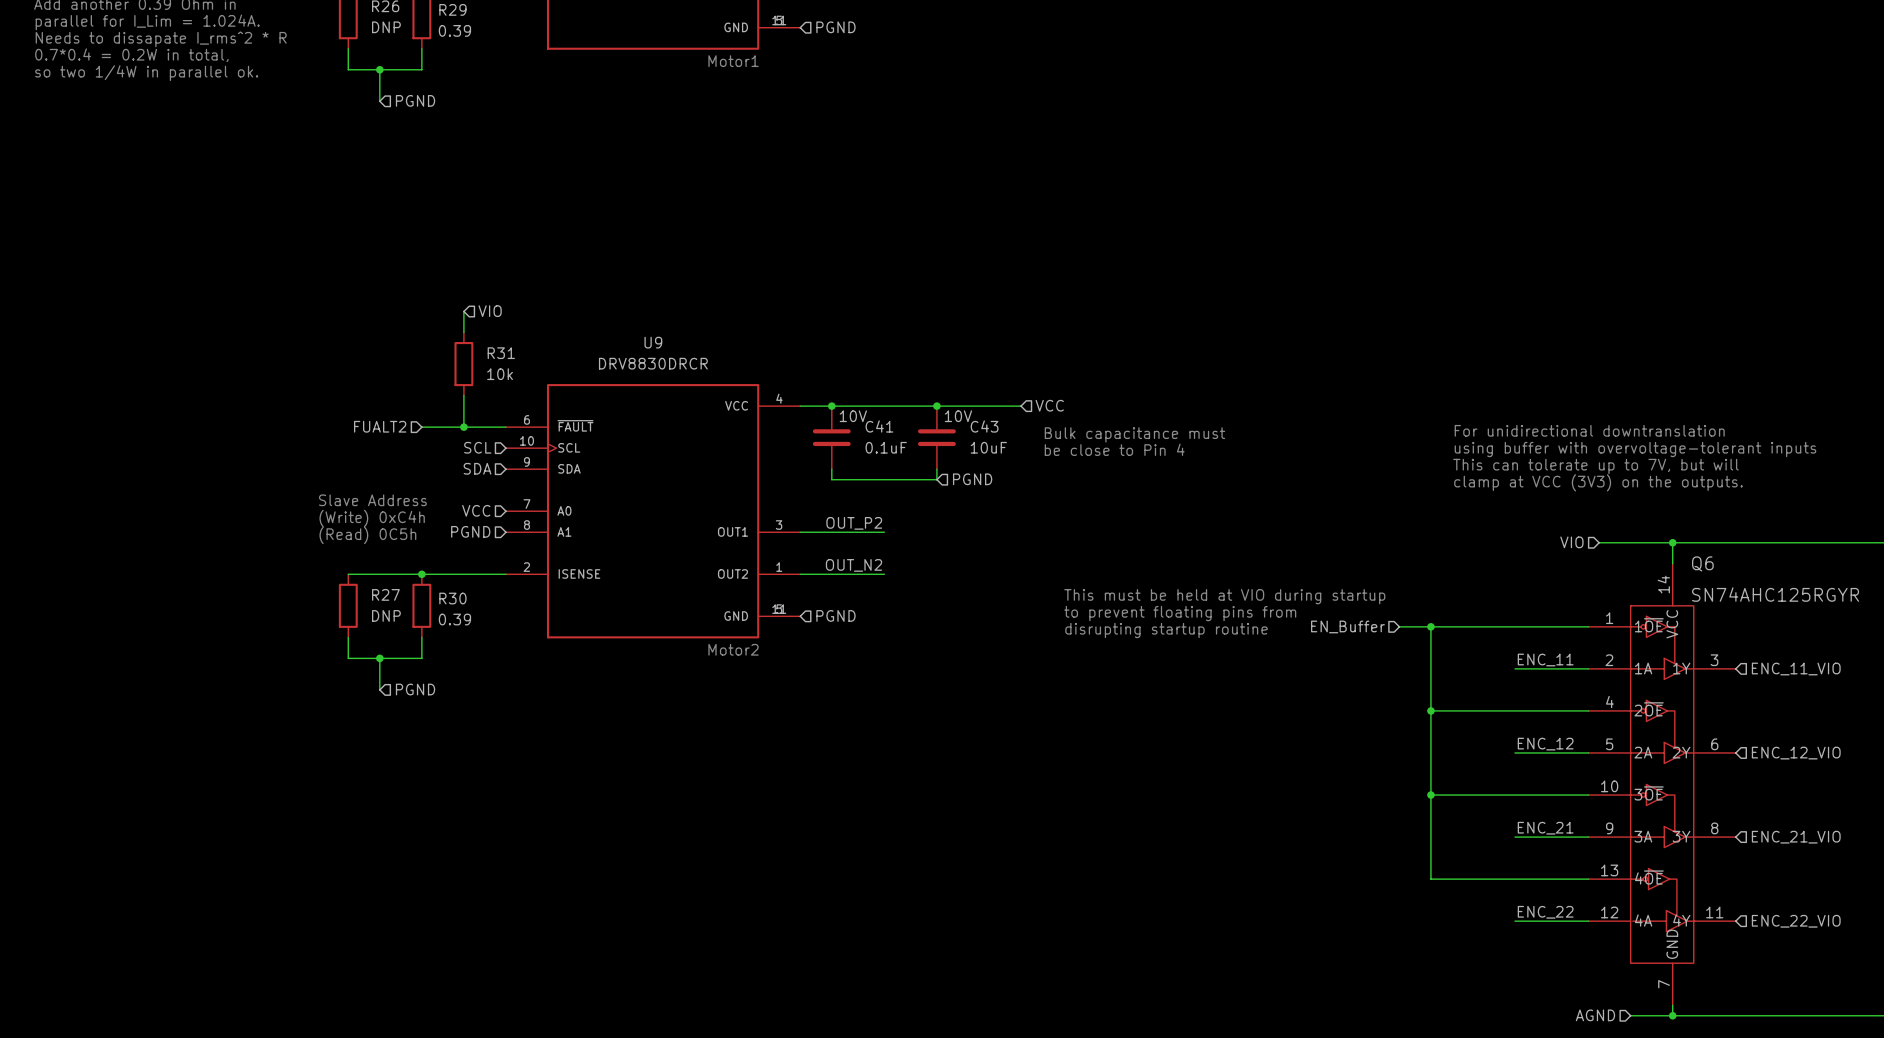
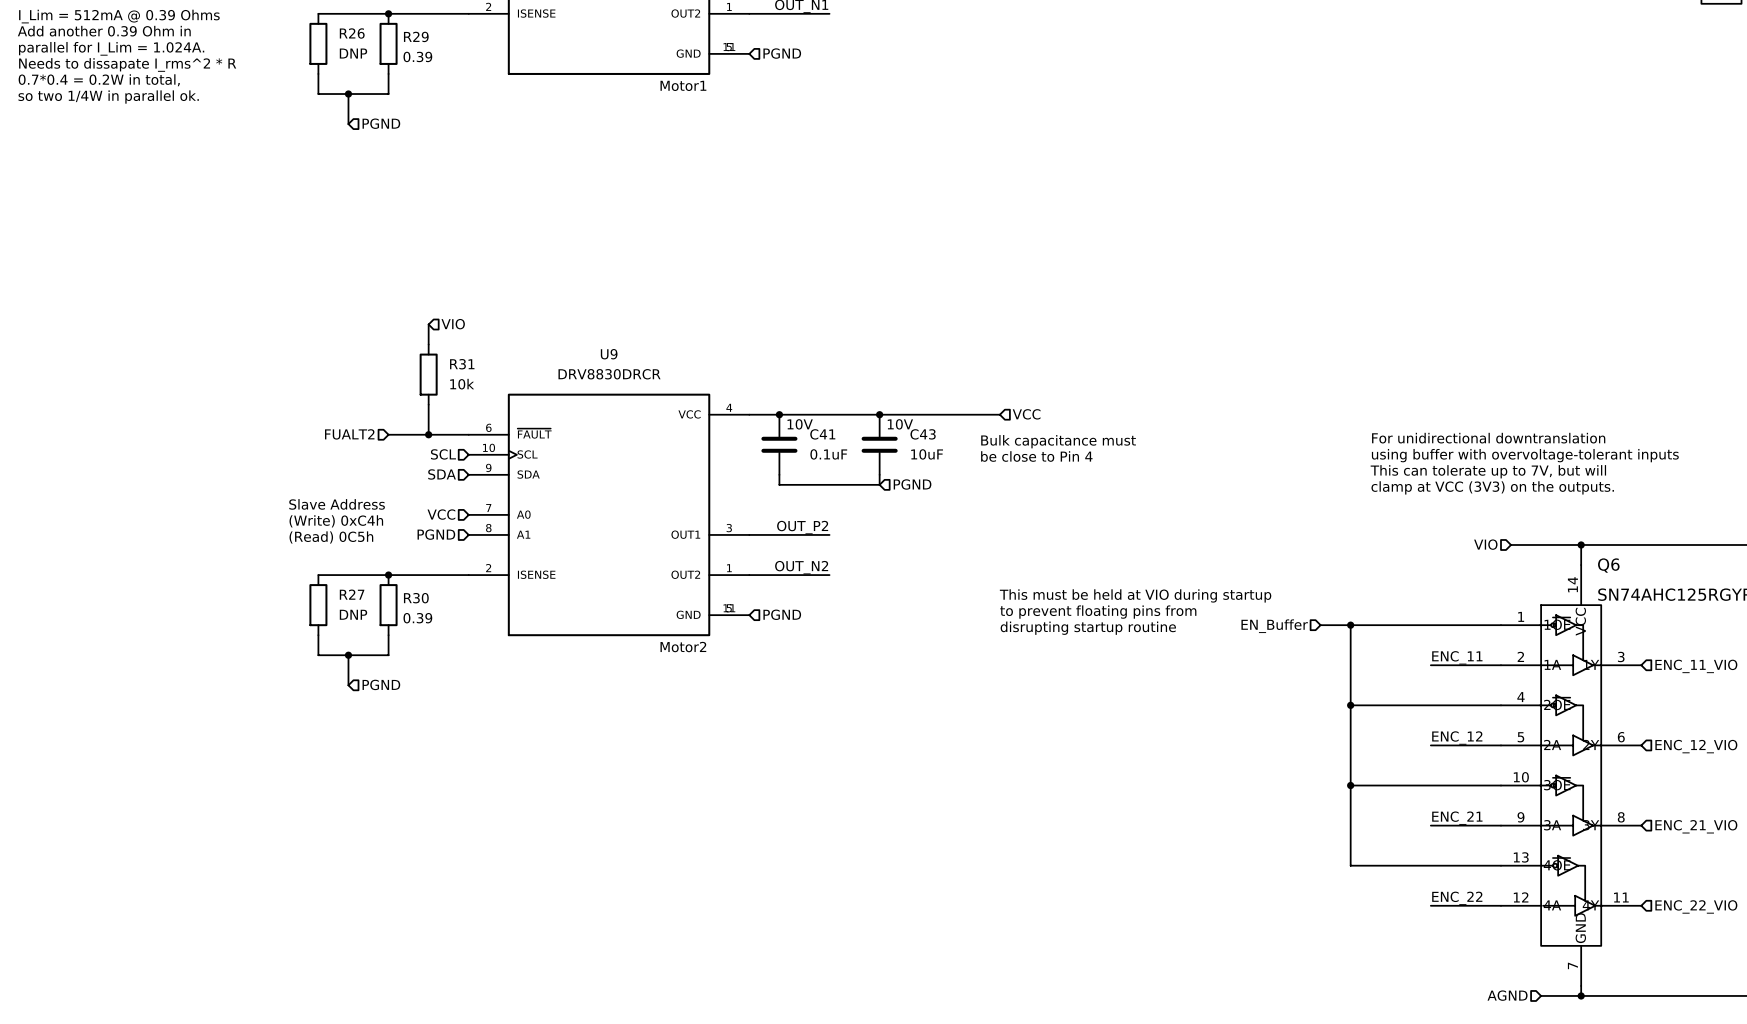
hierarchical label position: VCC (1049, 405) -> VCC (1026, 414)
wire: none -> (959, 414) (999, 414)

